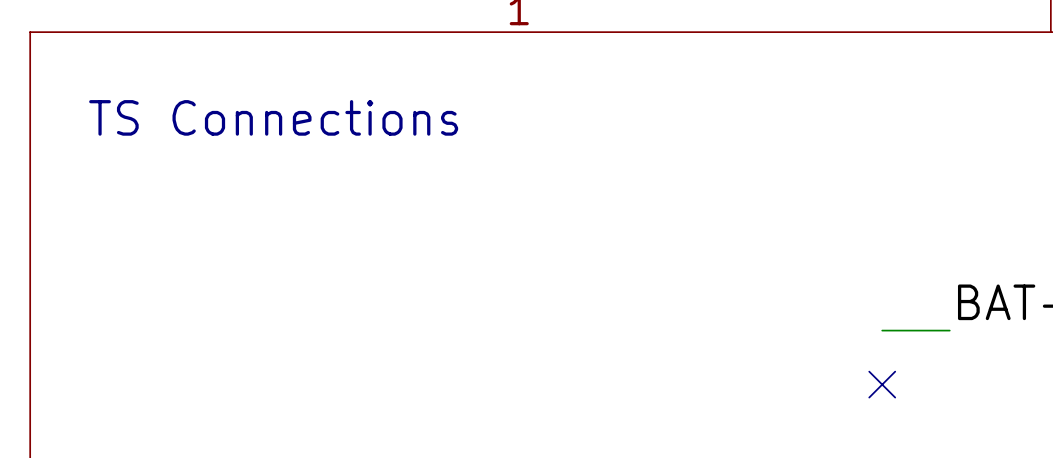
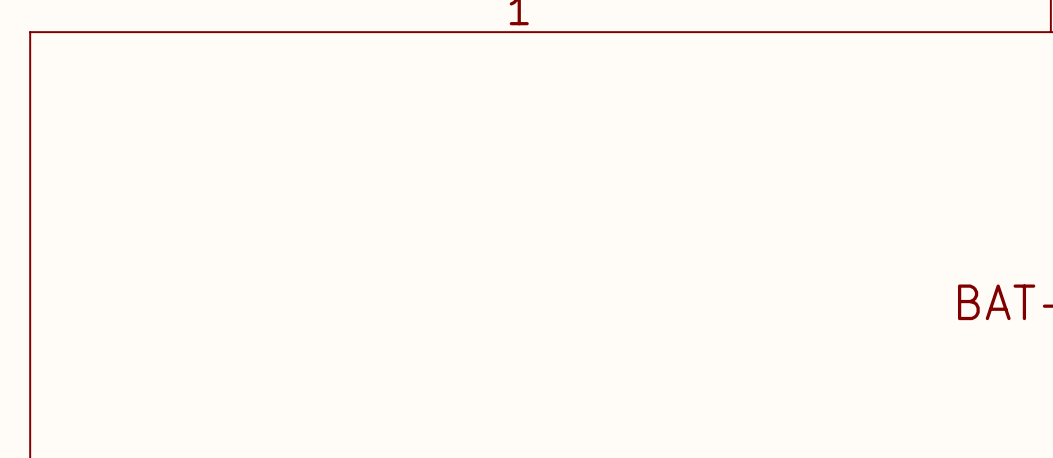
text: TS Connections (273, 117) -> none
wire: (882, 330) (949, 330) -> none
no-connect mark: (882, 384) -> none

